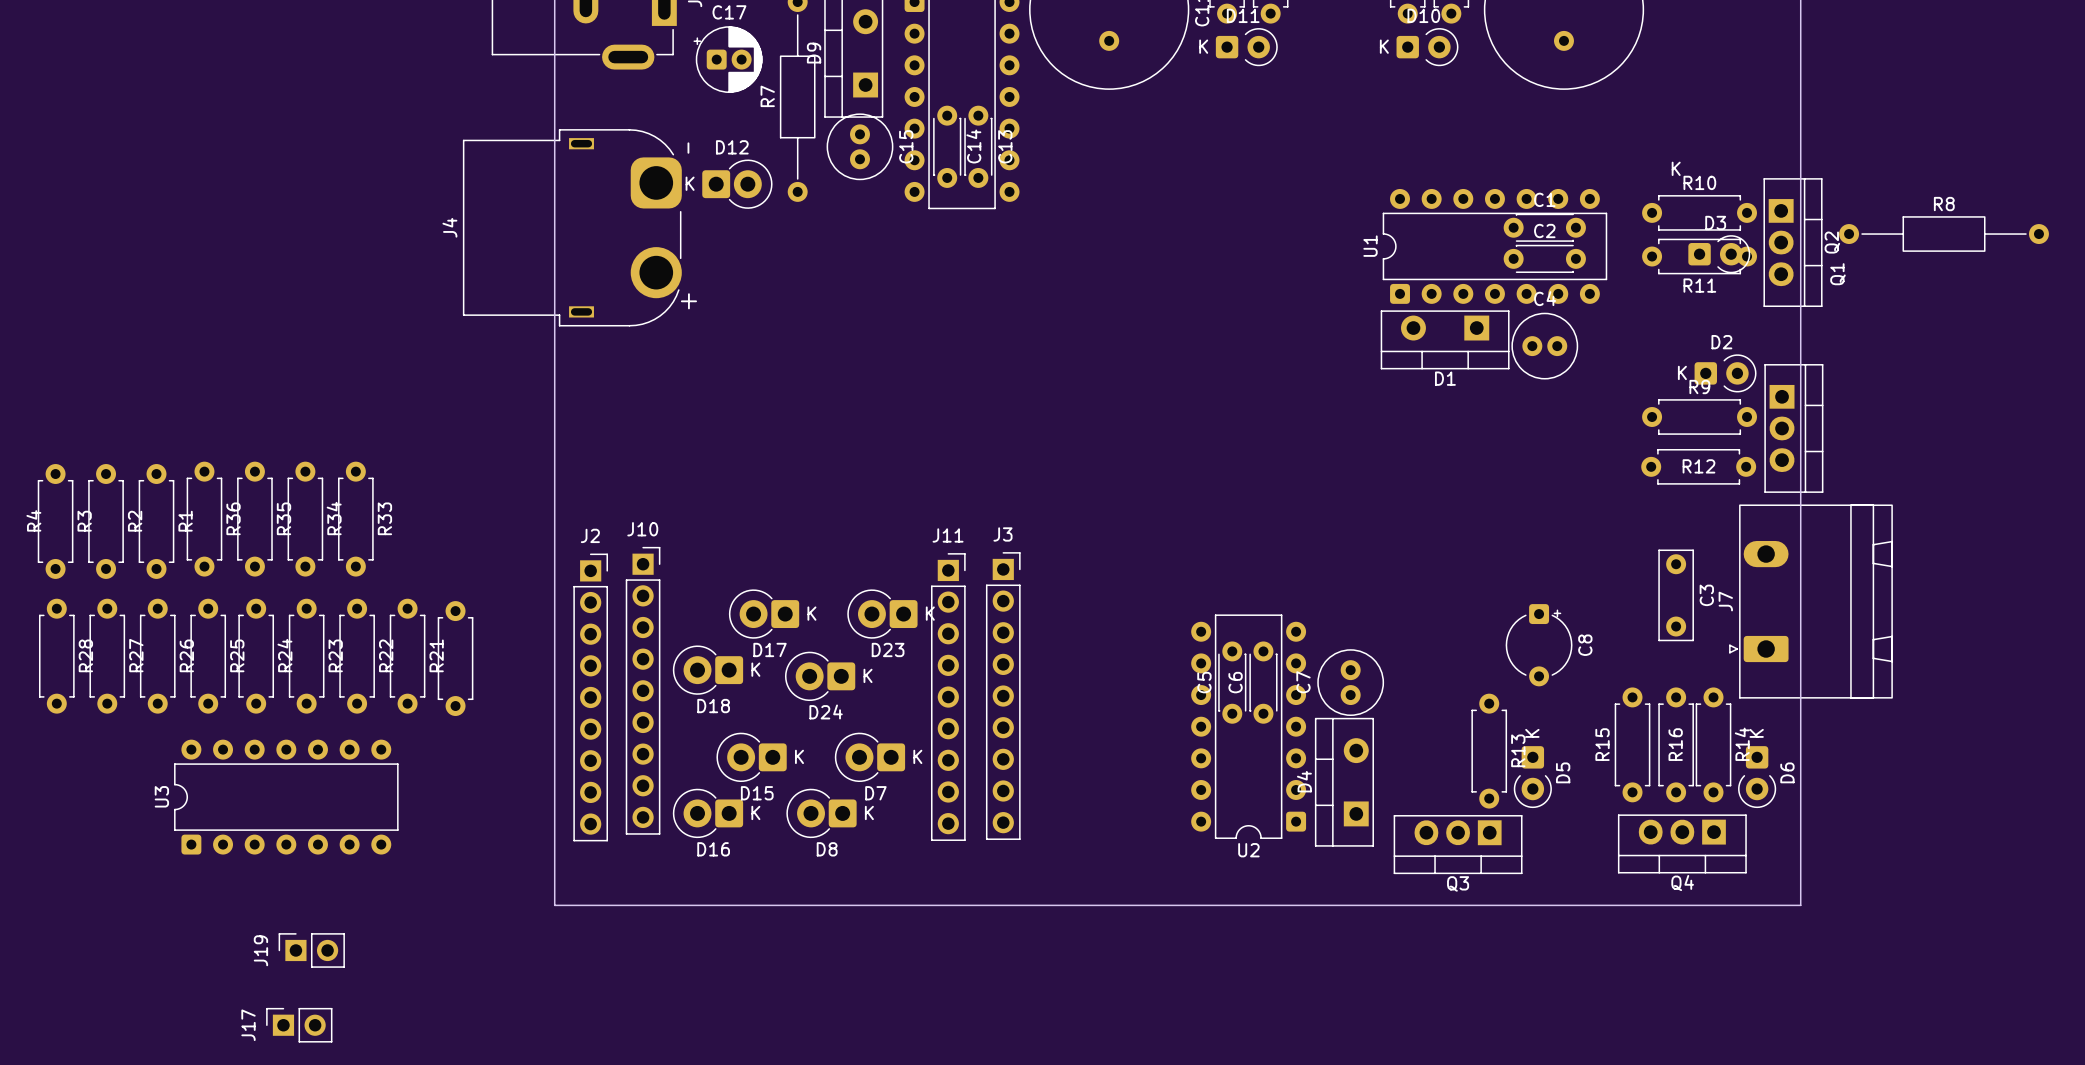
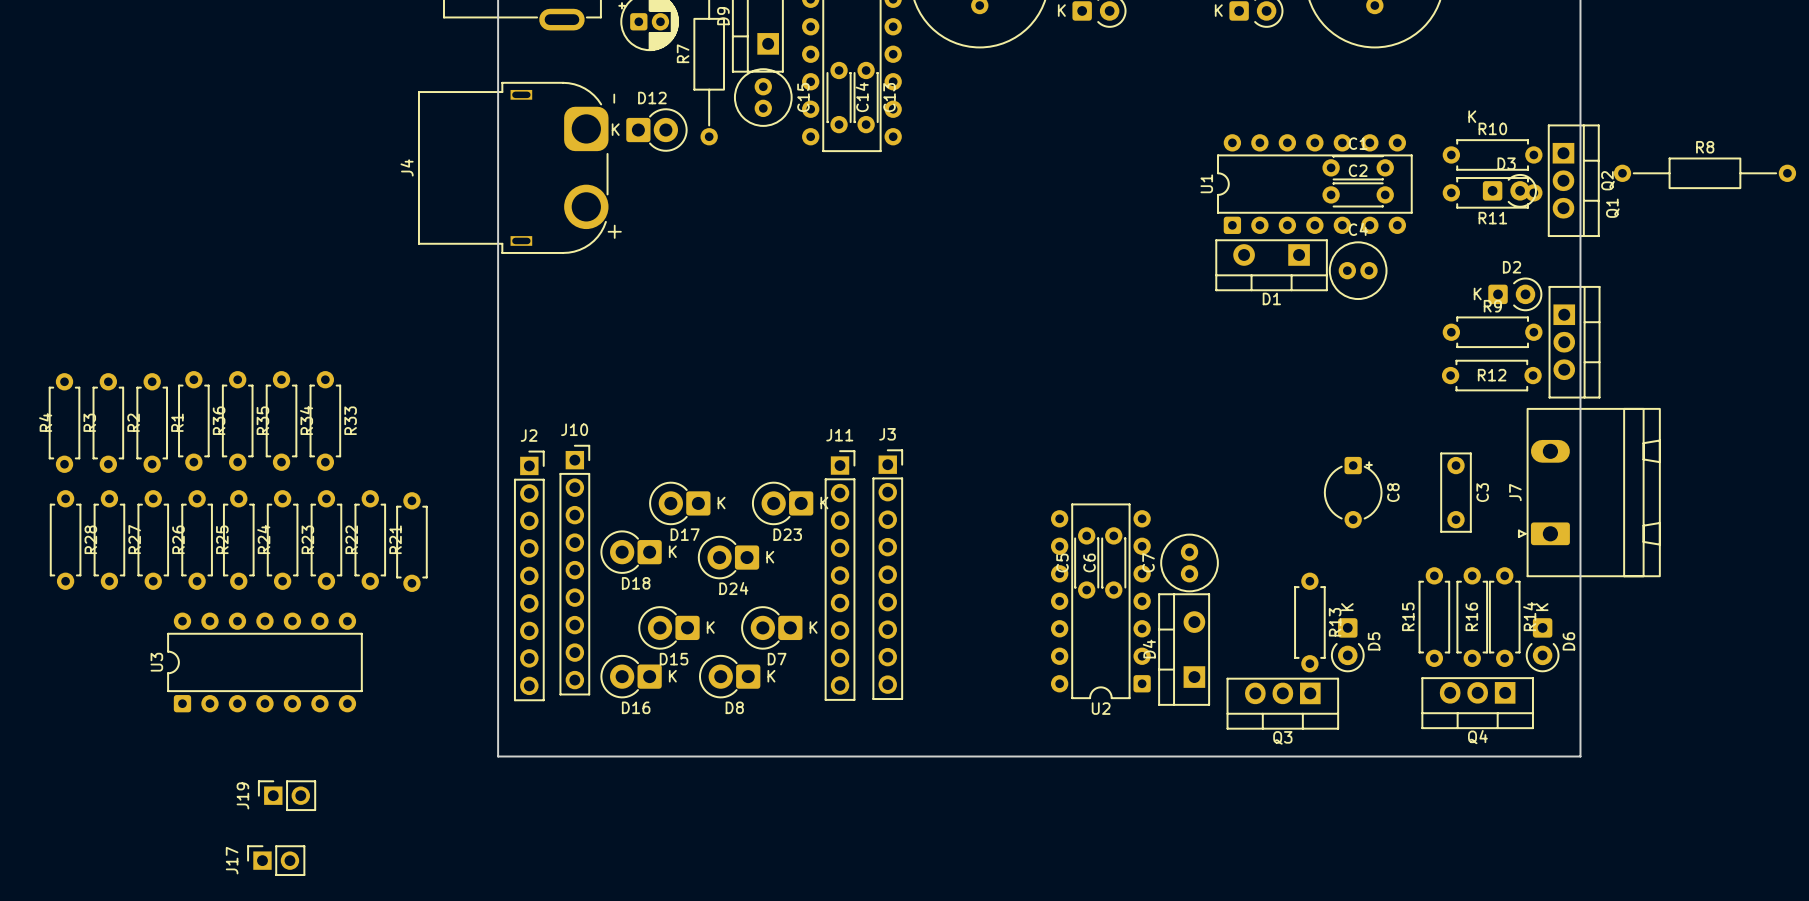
C3 position: (1676, 595) -> (1456, 492)
C8 position: (1539, 645) -> (1353, 492)

